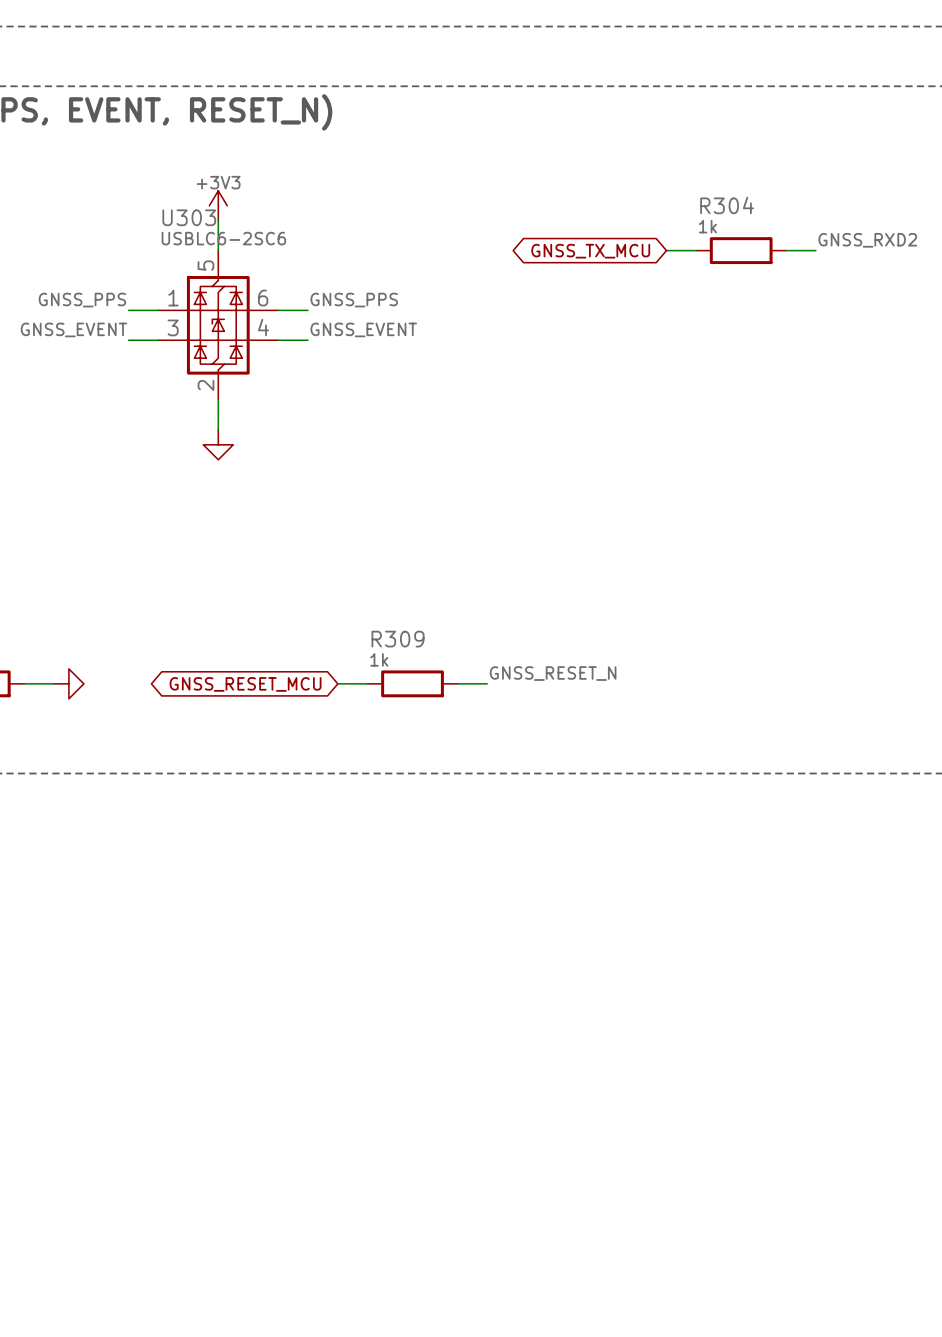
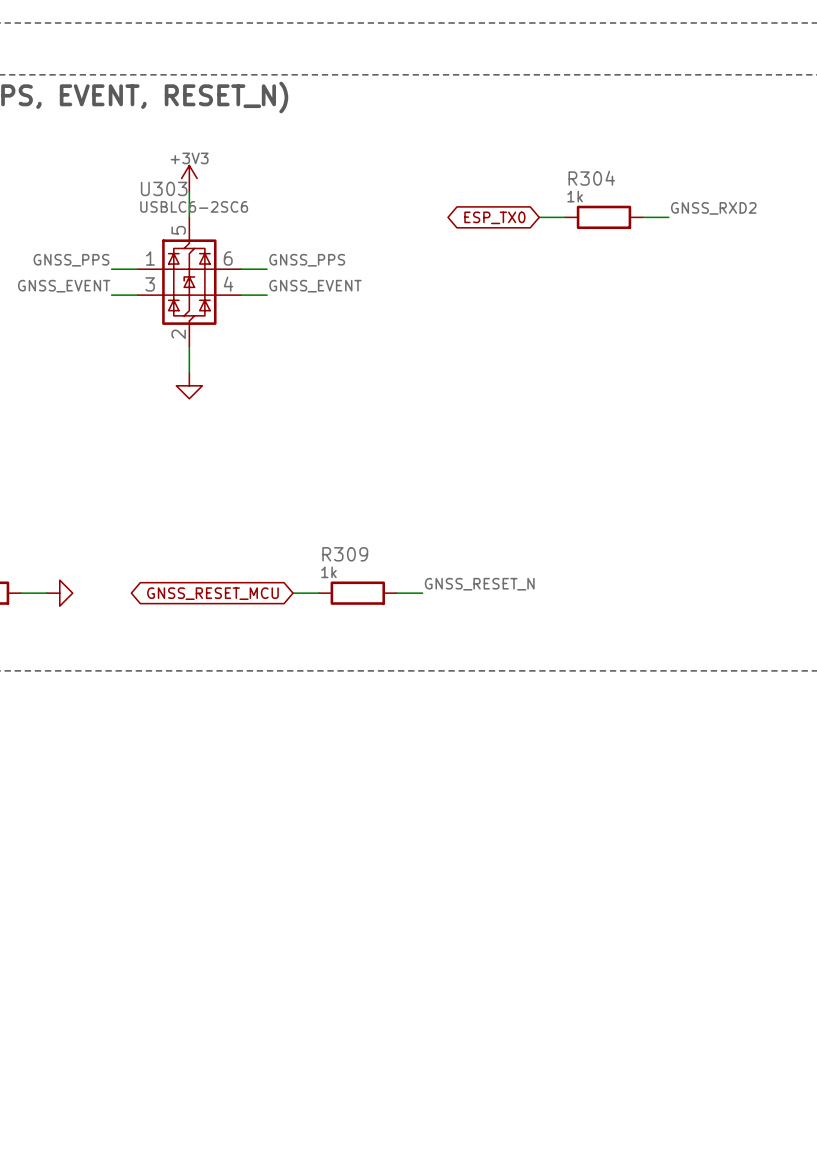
label position: GNSS_RXD2 (867, 240) -> GNSS_RXD2 (713, 208)
wire: (666, 250) (696, 250) -> (539, 217) (565, 217)
R304 position: (741, 250) -> (603, 217)
wire: (786, 250) (815, 250) -> (642, 217) (668, 217)
global label: none -> ESP_TX0 (494, 217)
global label: GNSS_TX_MCU (590, 251) -> none

